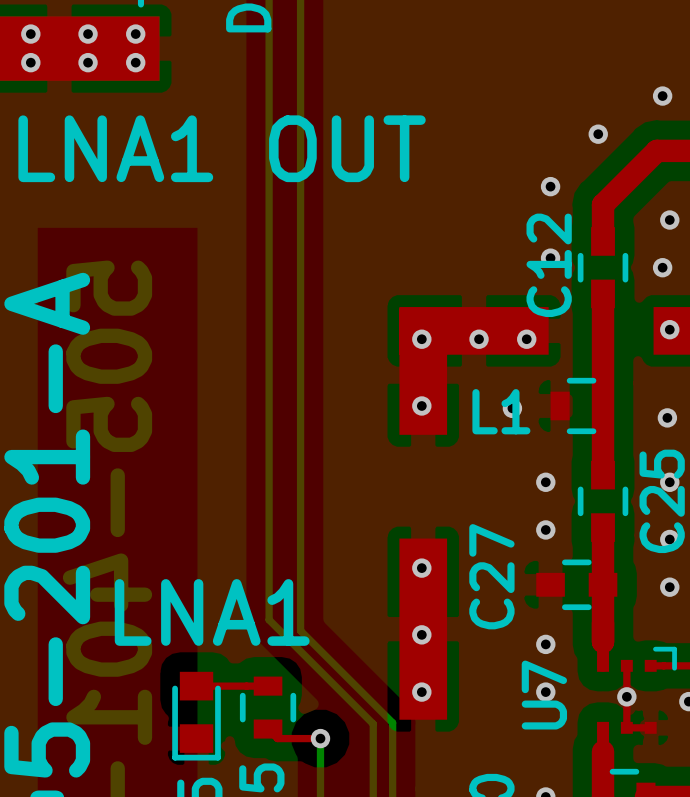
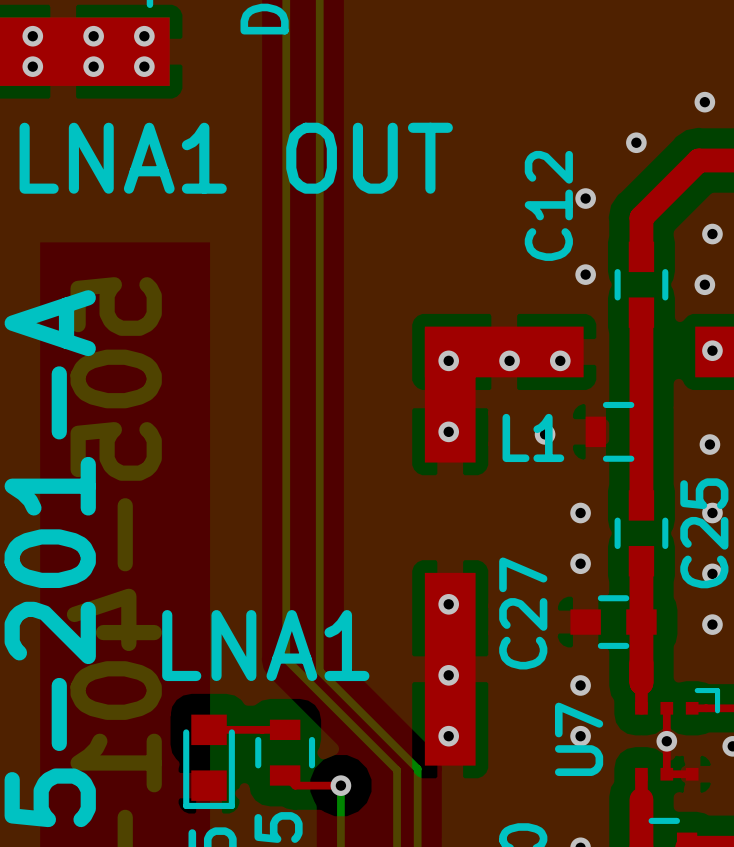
C12 name position: C12 (549, 265) -> C12 (548, 205)
text position: LNA1 (212, 612) -> LNA1 (265, 645)

